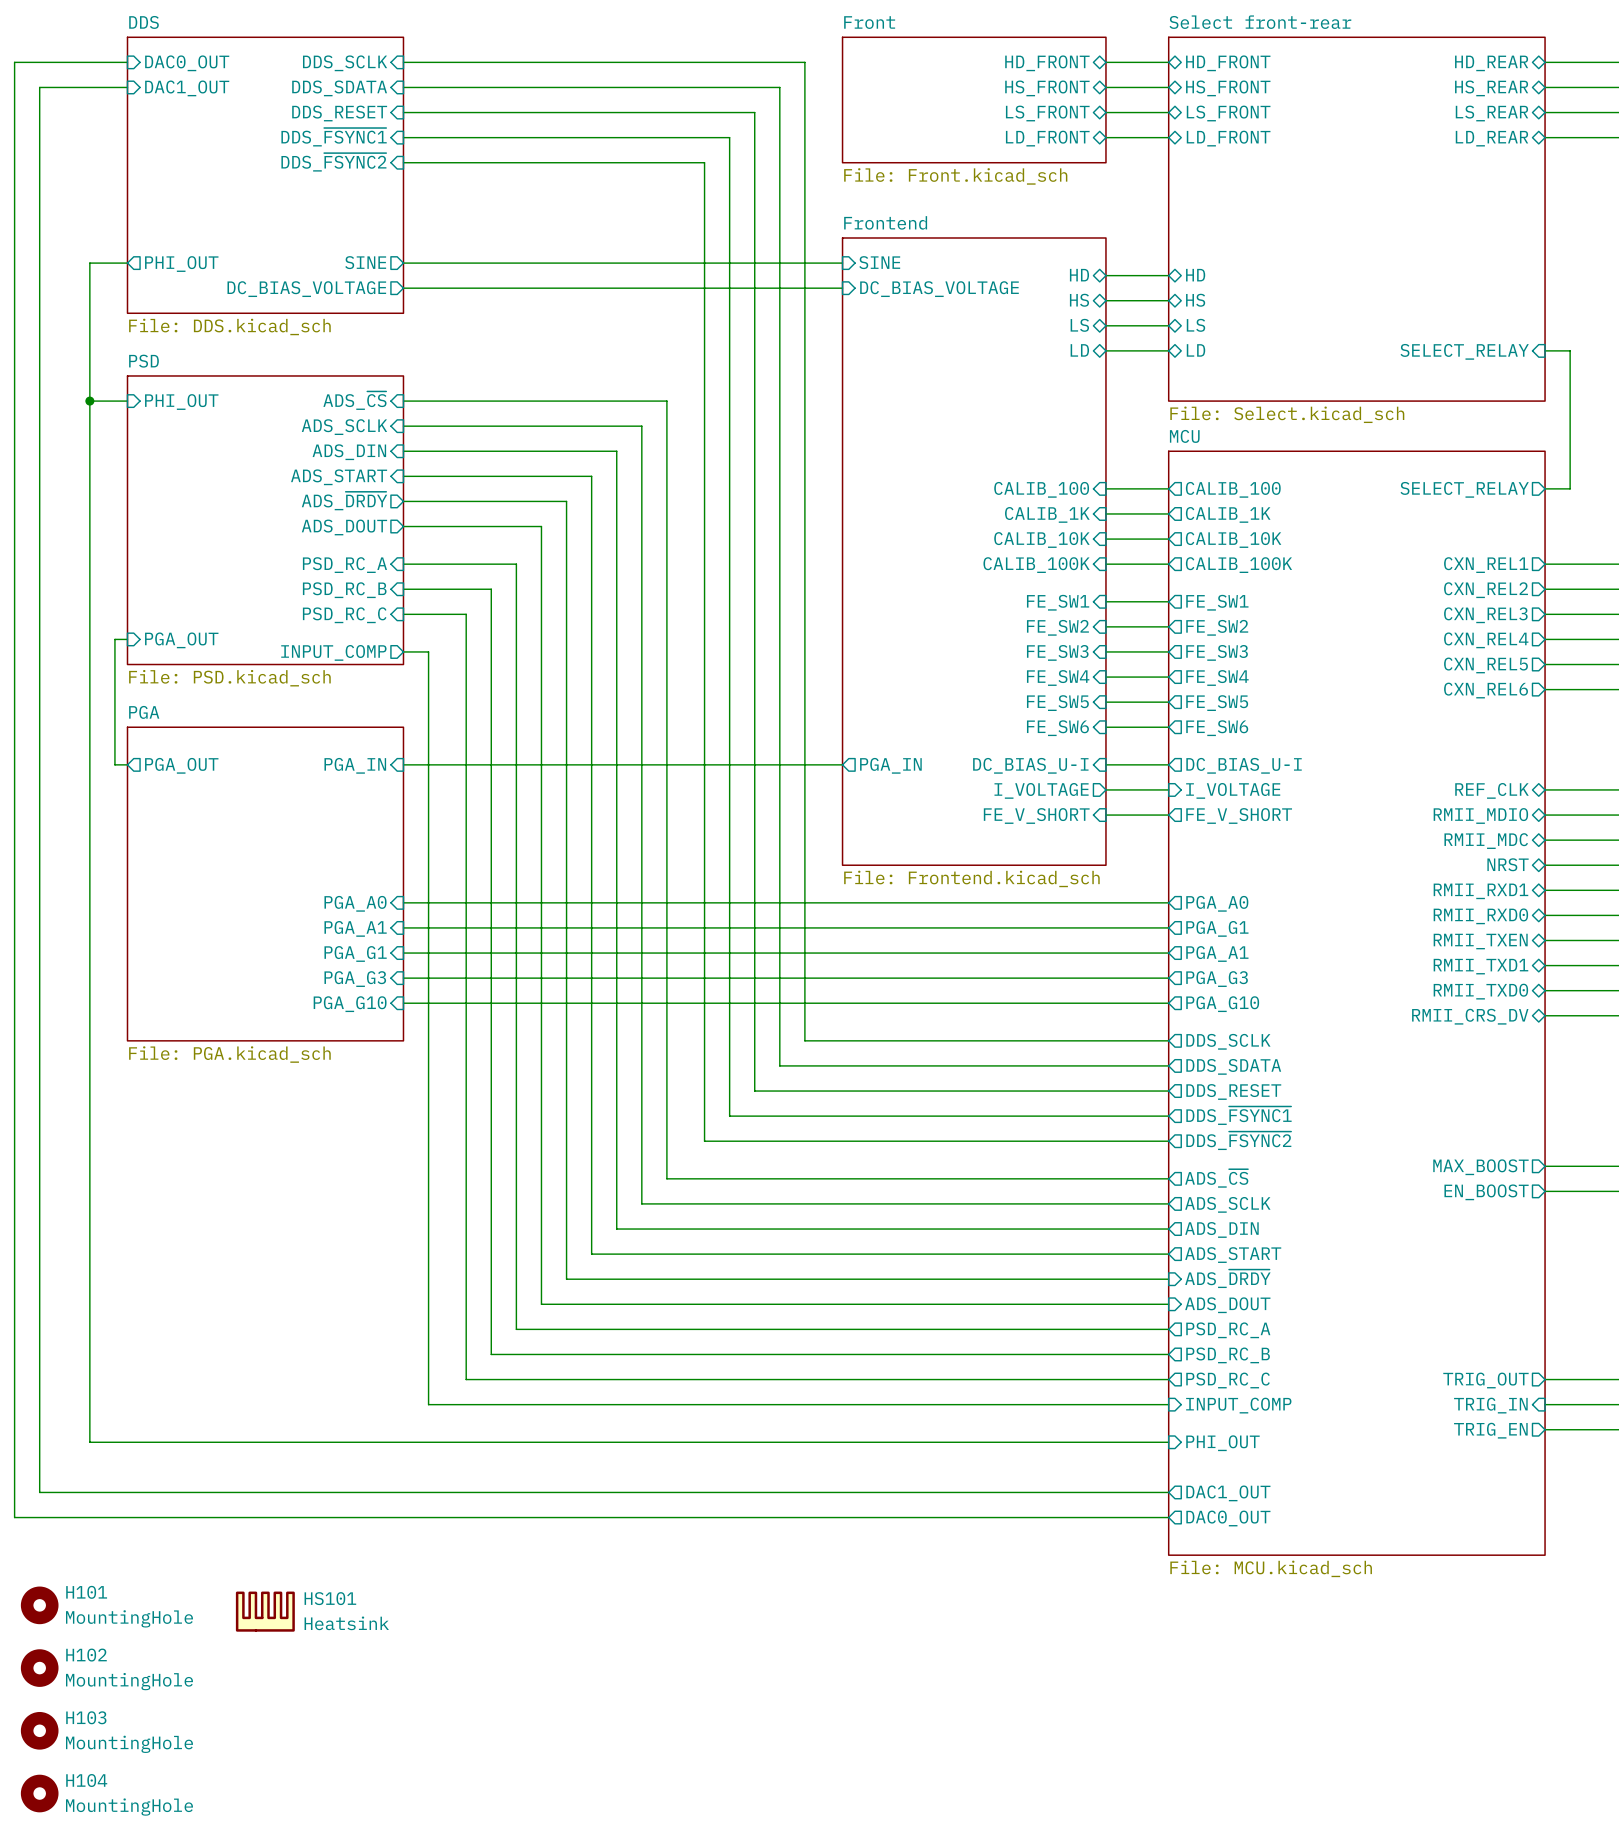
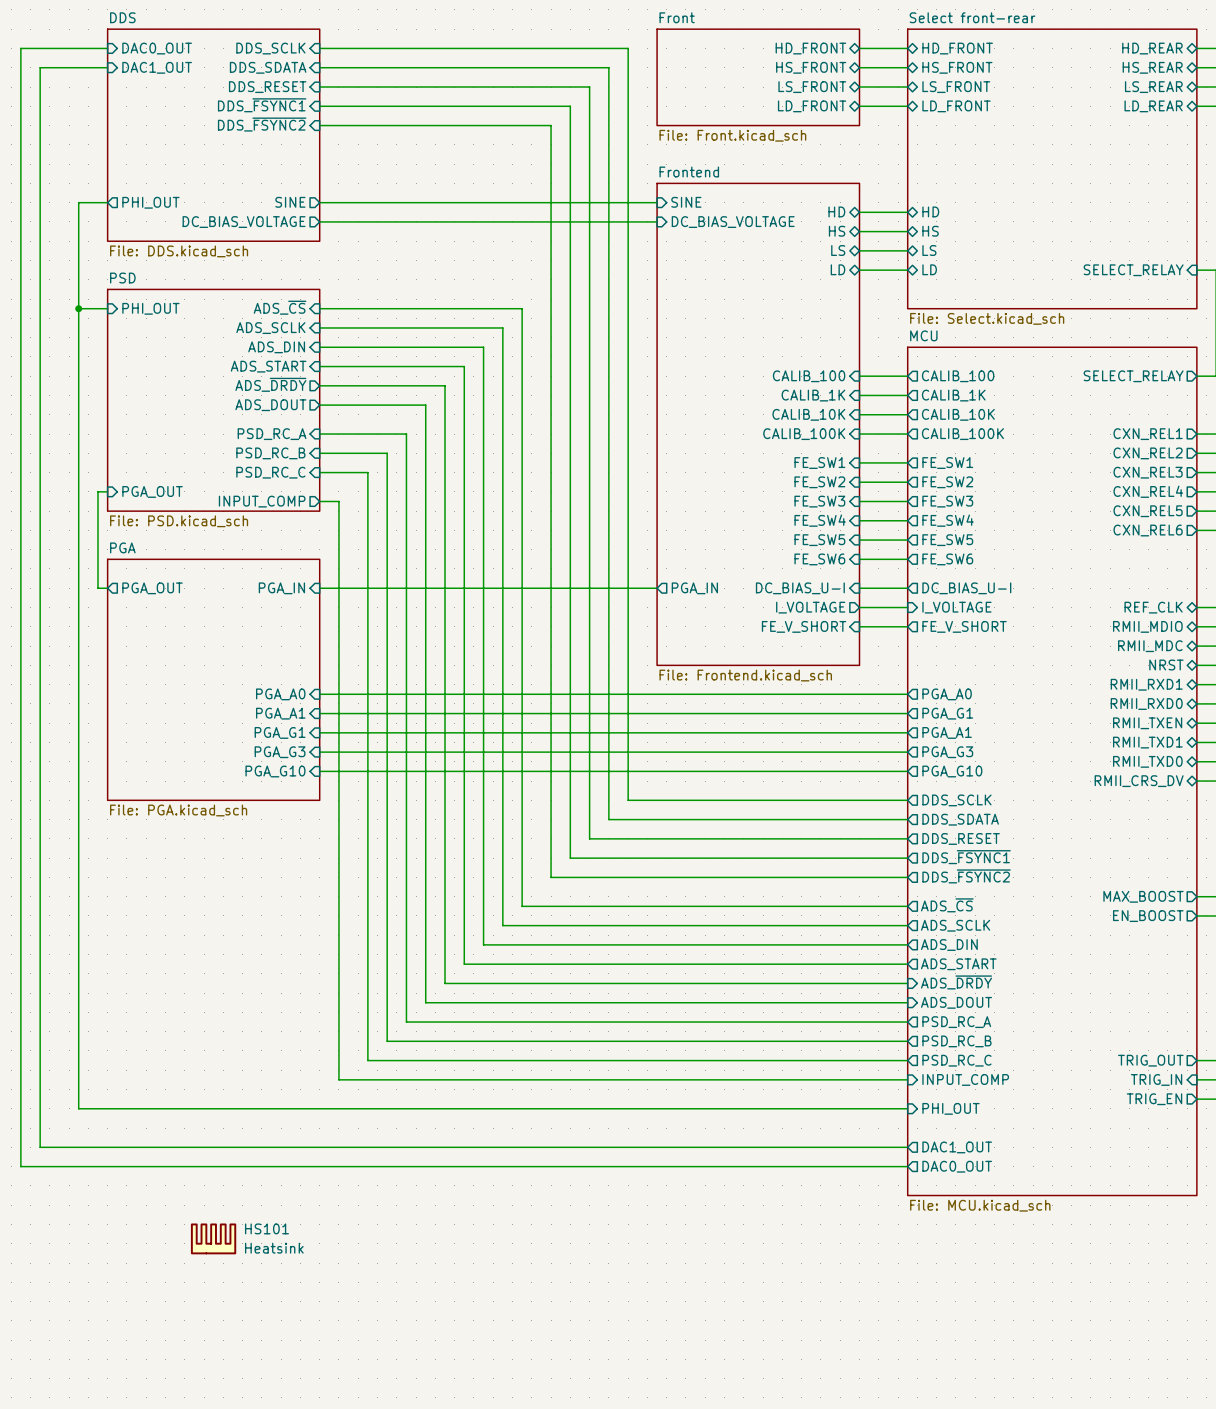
H101: MountingHole (39, 1605) -> none
H102: MountingHole (39, 1668) -> none
H103: MountingHole (39, 1730) -> none
H104: MountingHole (39, 1793) -> none

